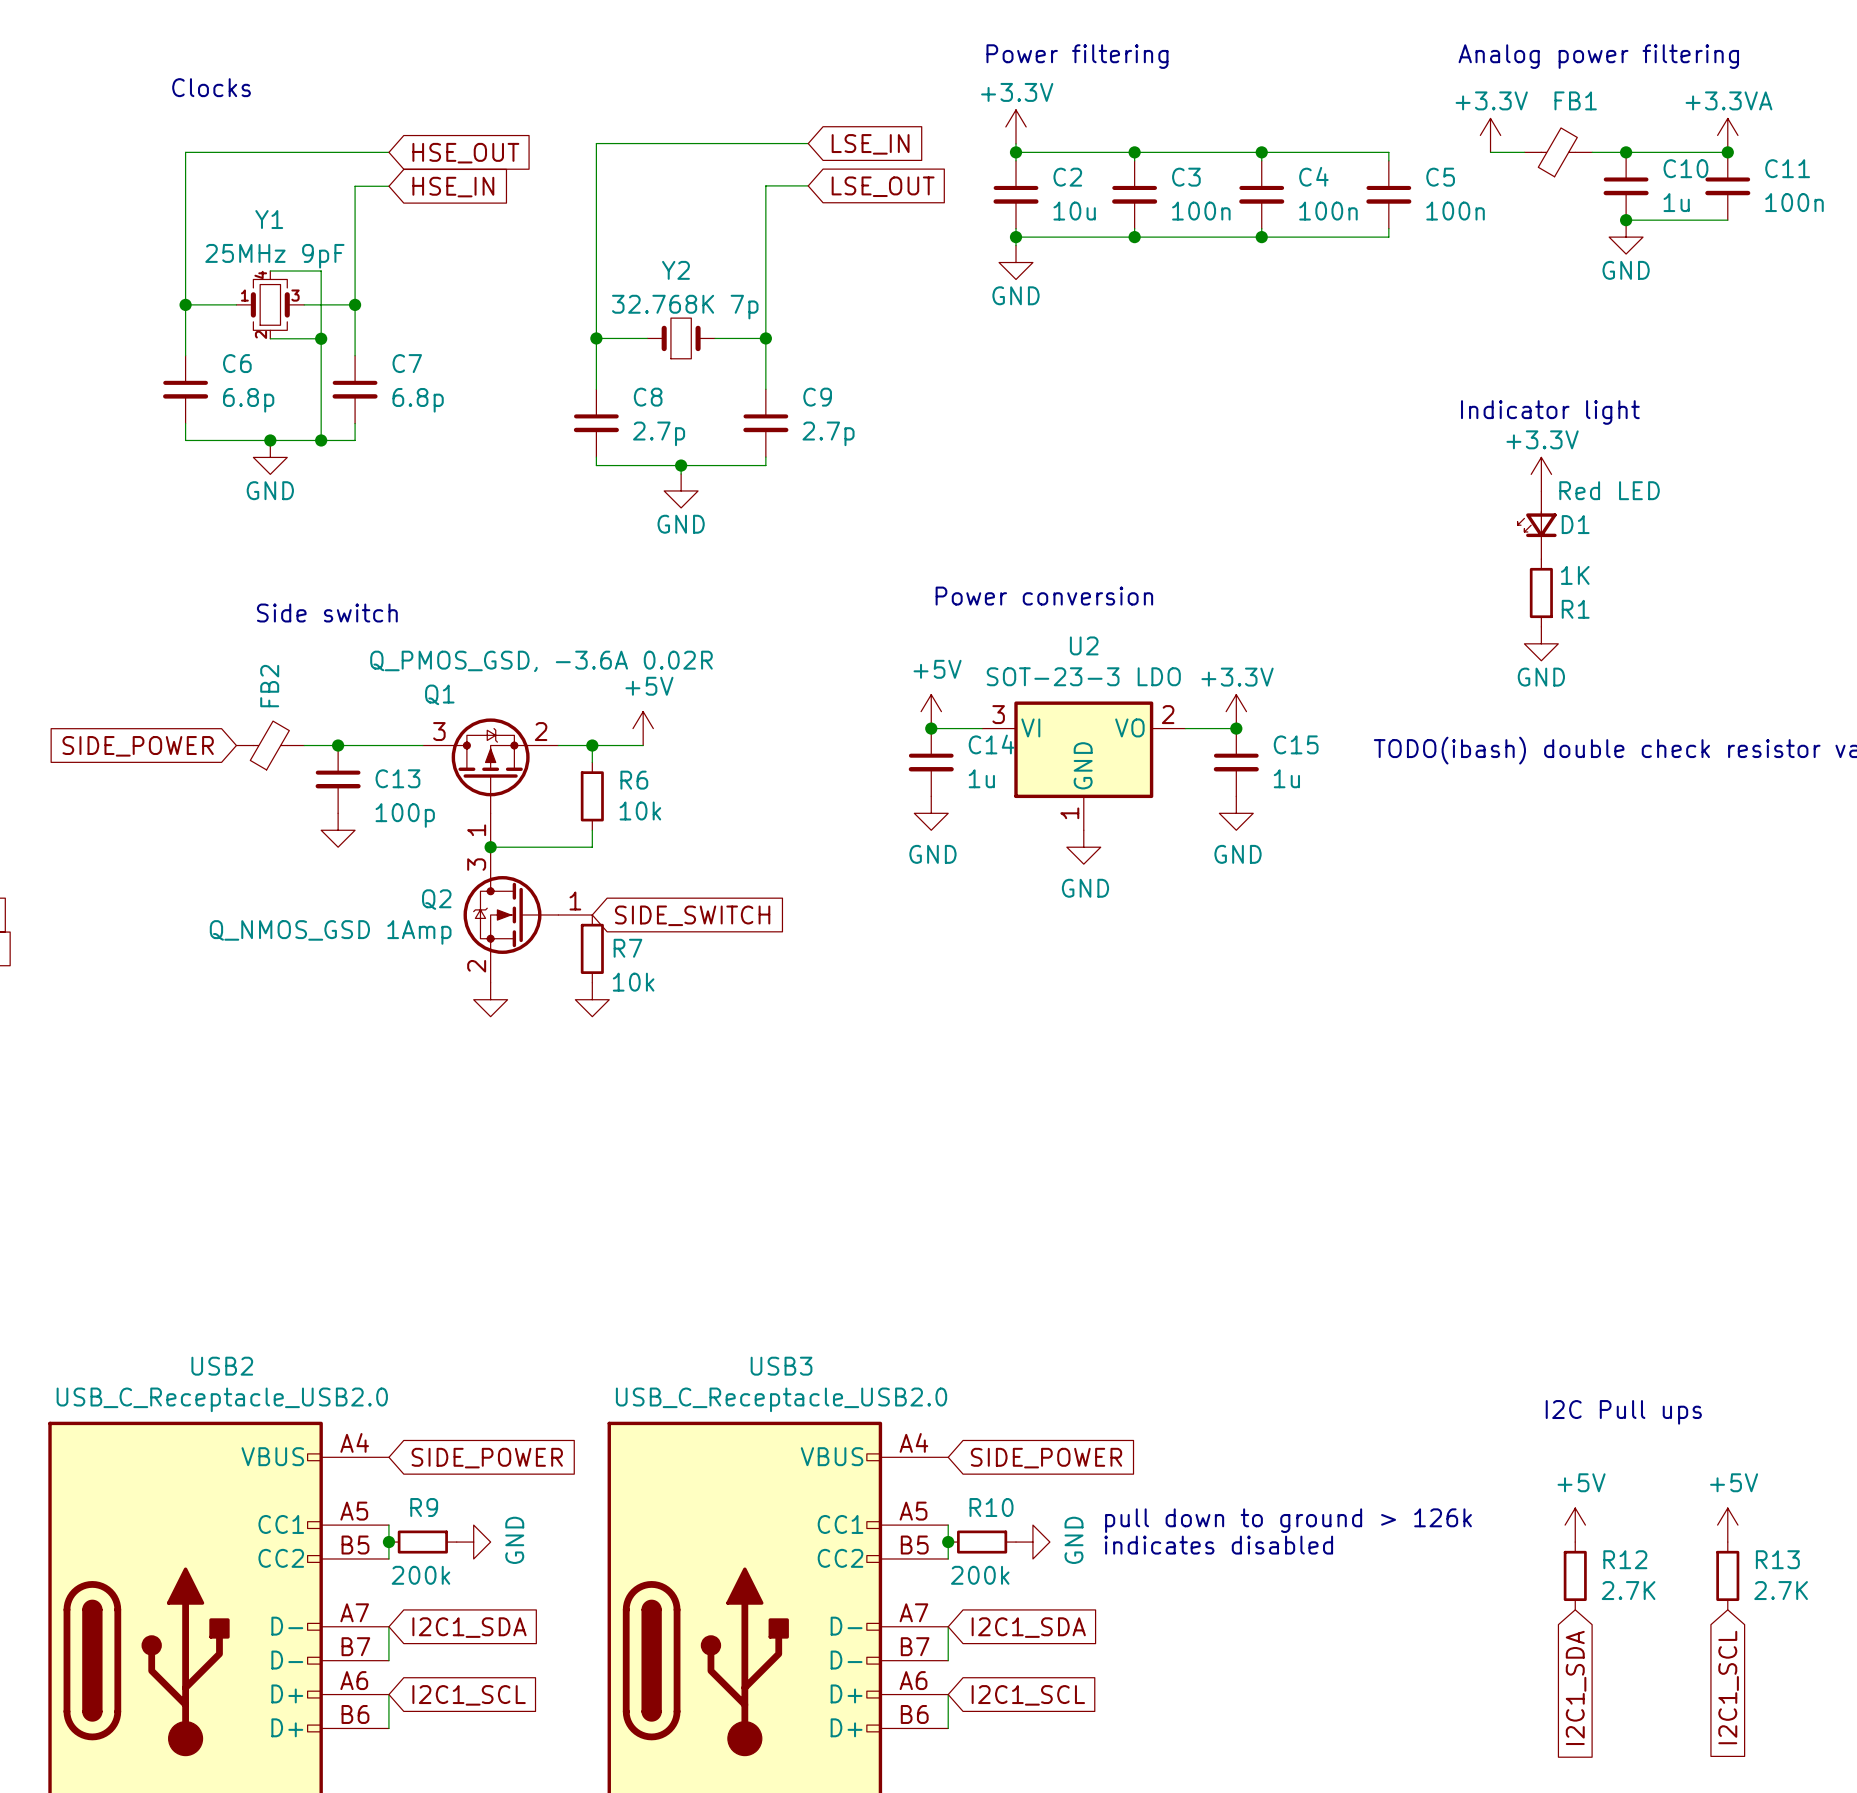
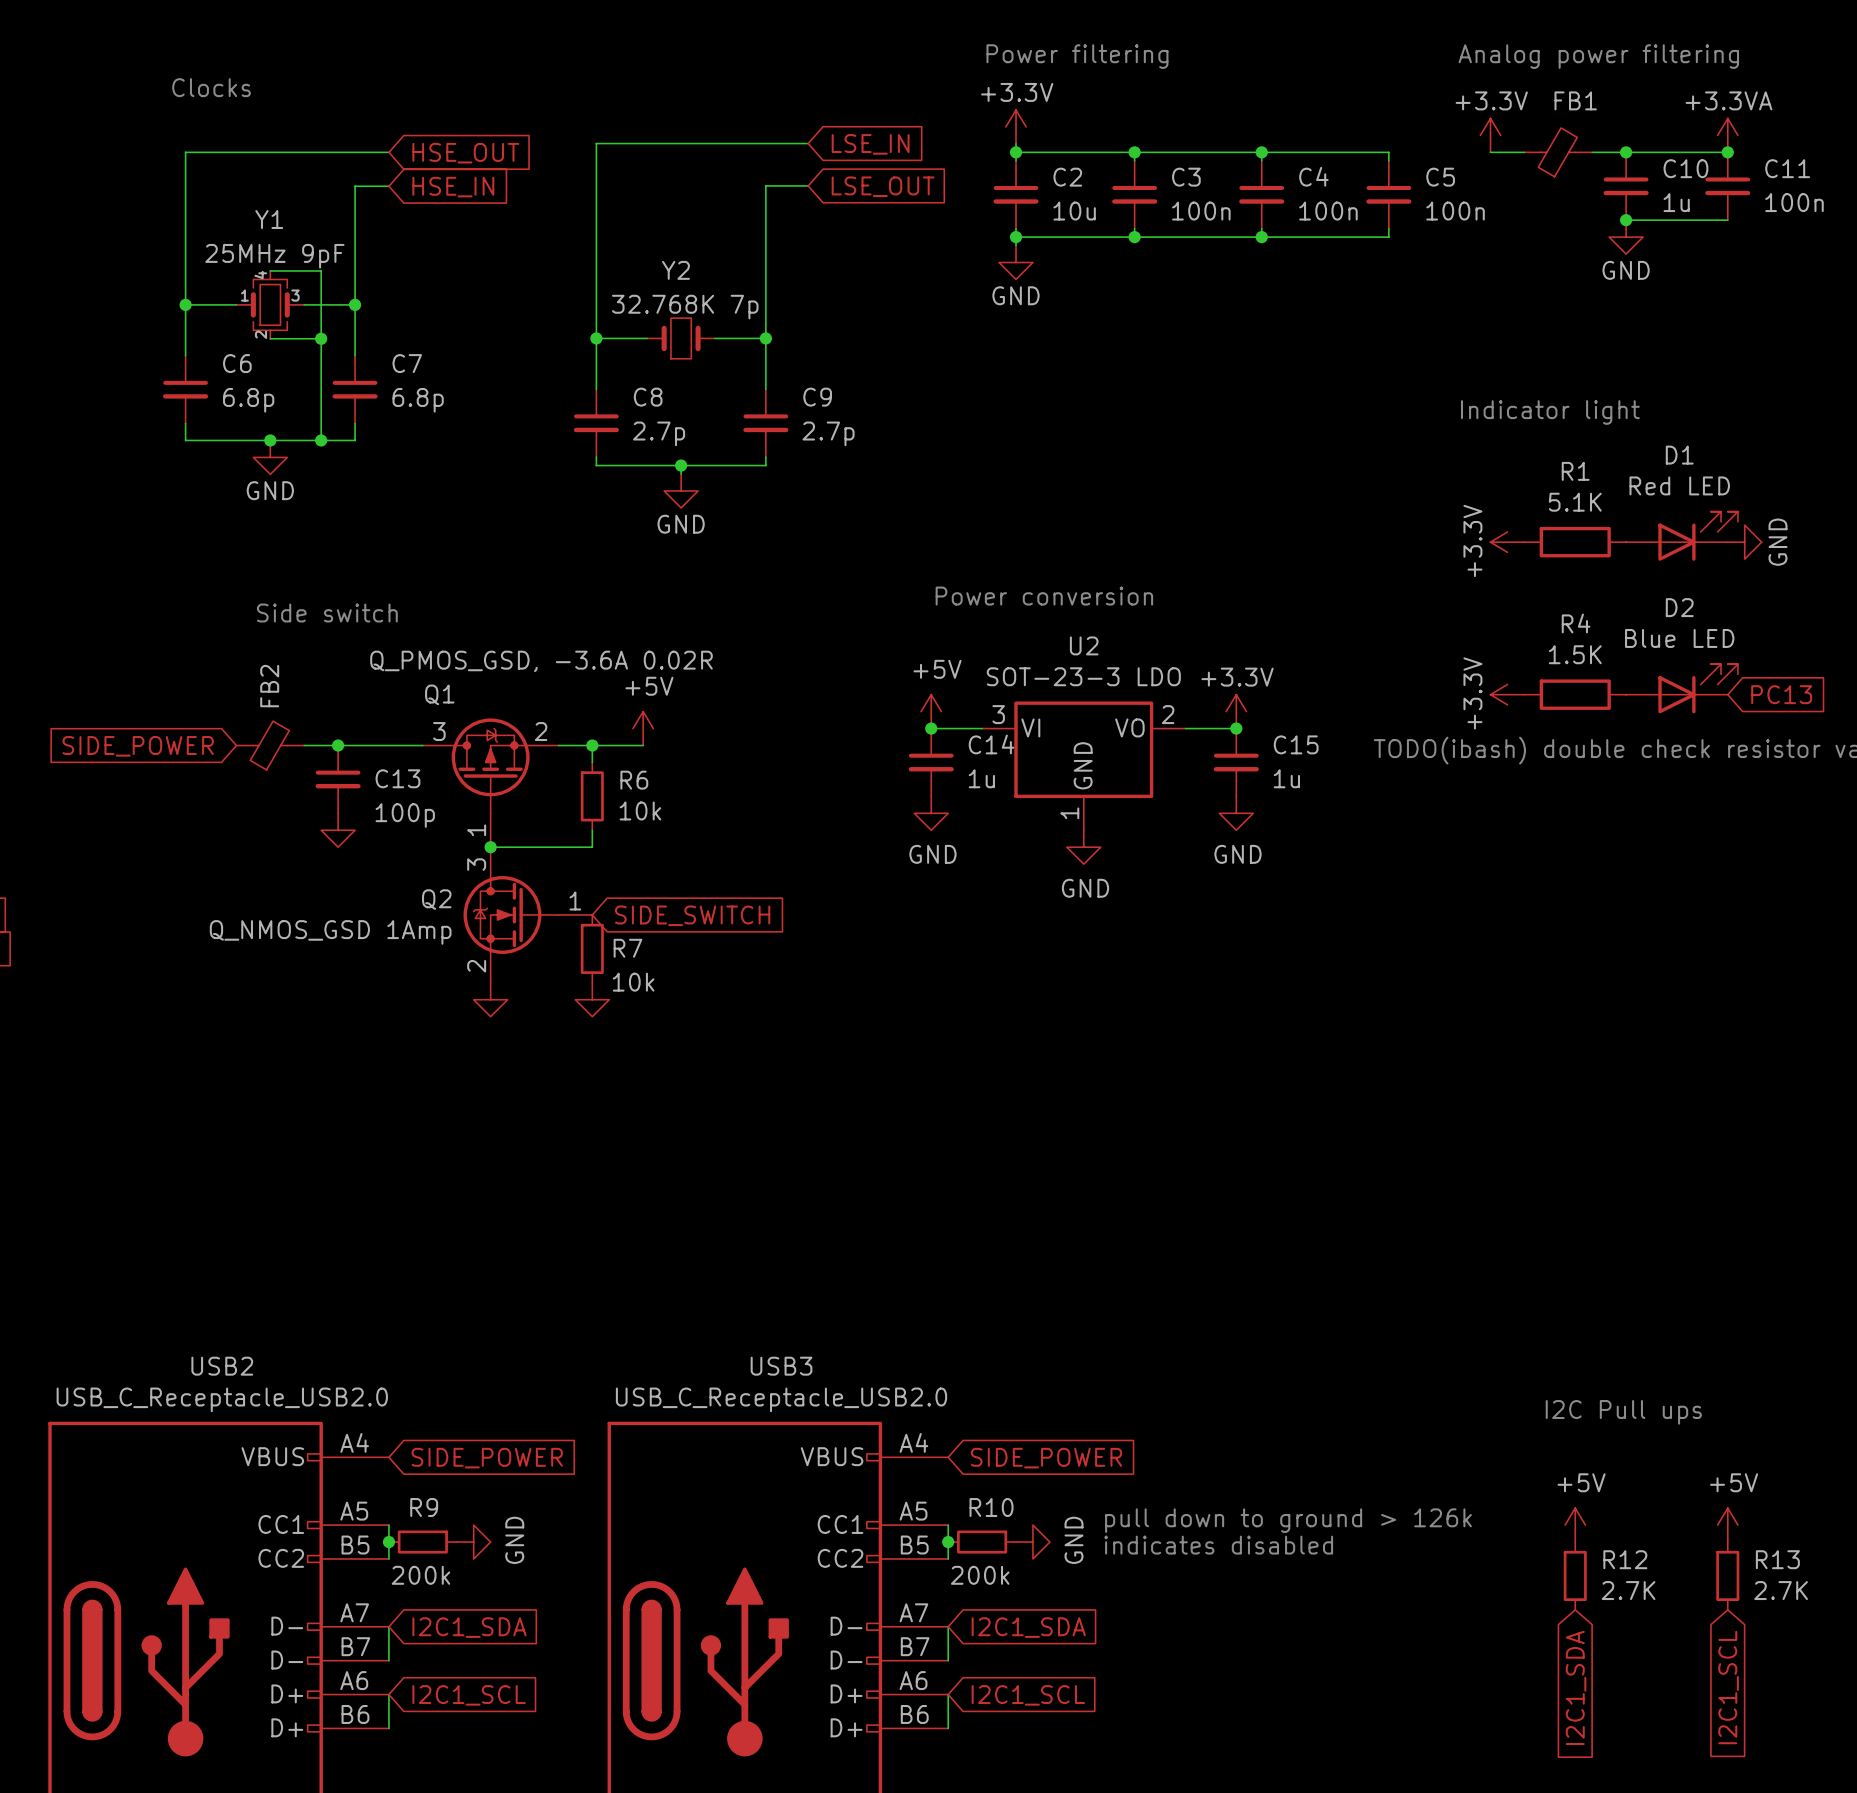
power symbol rotation: 0° (1541, 474) -> 90° counterclockwise (1507, 542)
power symbol position: +3.3V (1541, 474) -> +3.3V (1507, 542)
D1 value position: Red LED (1609, 490) -> Red LED (1679, 485)
D1 symbol: [1517, 491, 1557, 560] -> [1626, 511, 1738, 561]
D1 name position: D1 (1575, 524) -> D1 (1679, 455)
R1 symbol: [1529, 559, 1553, 627] -> [1524, 526, 1627, 558]
R1 value: 1K (1575, 575) -> 5.1K (1575, 502)
R1 name position: R1 (1575, 609) -> R1 (1575, 471)
power symbol rotation: 0° (1541, 643) -> 90° counterclockwise (1744, 542)
power symbol position: GND (1541, 643) -> GND (1744, 542)
D2: none -> Blue LED (1682, 688)
power symbol: none -> +3.3V (1507, 694)
R4: none -> 1.5K (1575, 694)
global label: none -> PC13 (1781, 694)

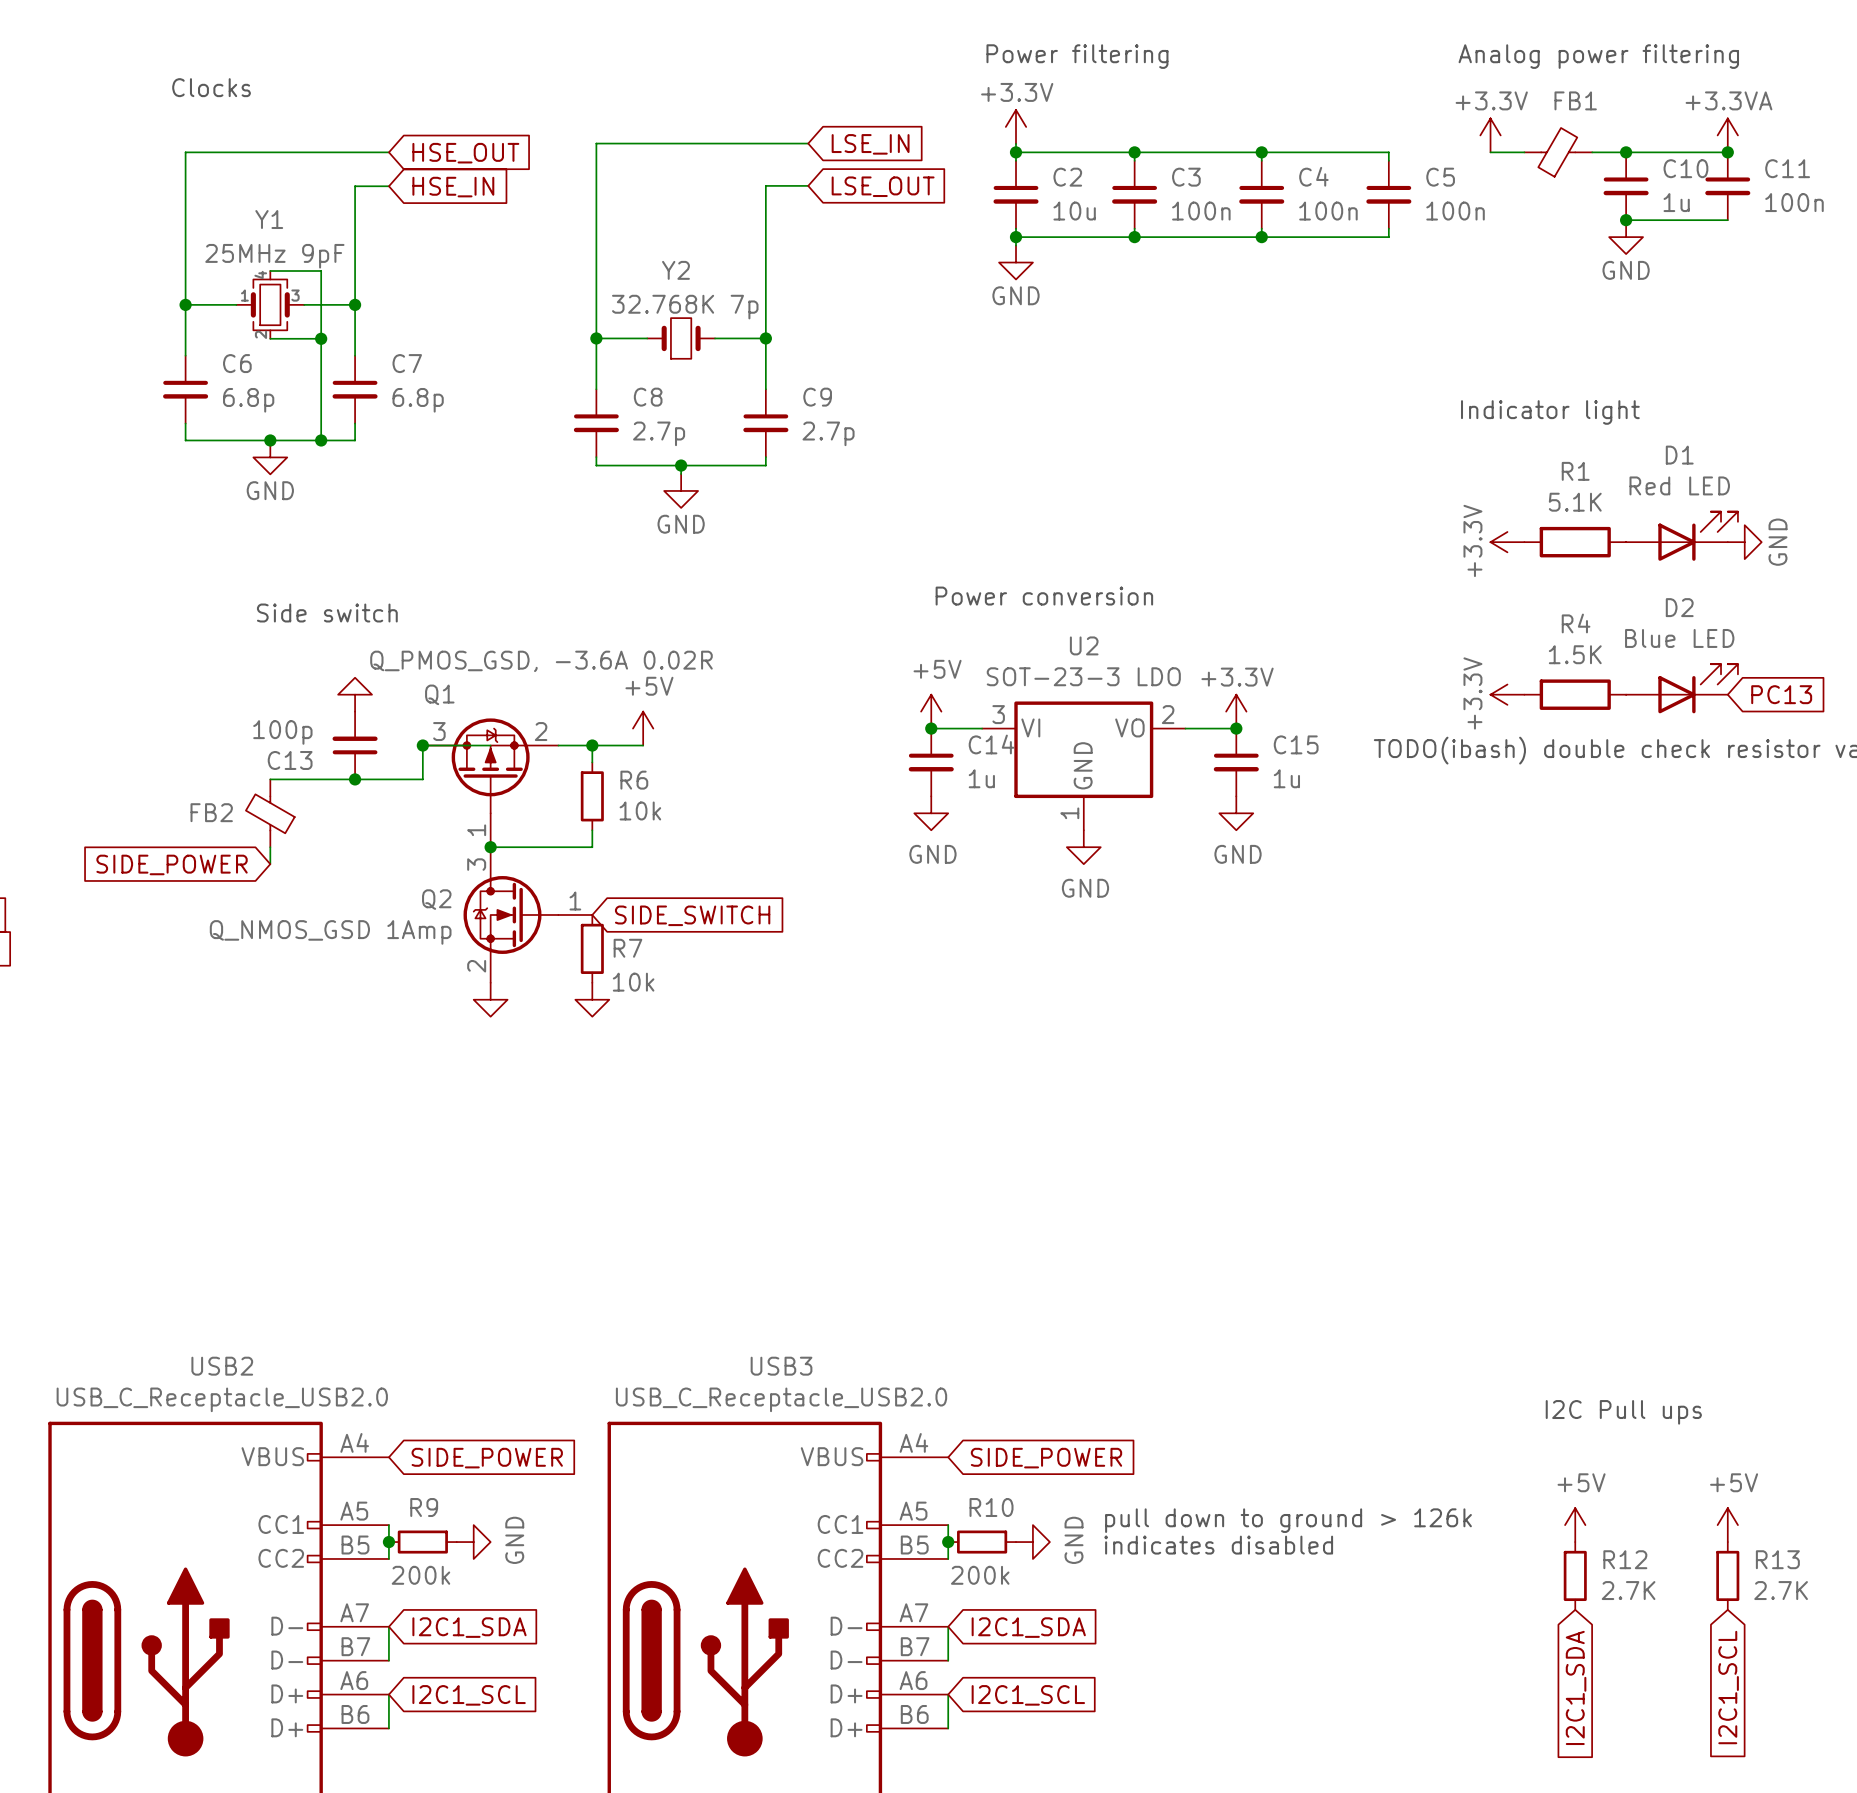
FB2 rotation: 0° (269, 745) -> 90° counterclockwise (270, 813)
FB2 position: (270, 745) -> (270, 813)
wire: (304, 745) (422, 745) -> none
junction position: (338, 745) -> (355, 779)
junction: none -> (422, 745)
wire: none -> (490, 745) (422, 745) (422, 779) (270, 779)
global label position: SIDE_POWER (138, 746) -> SIDE_POWER (172, 864)
C13 rotation: 0° (338, 779) -> 180° (355, 745)
power symbol rotation: 0° (338, 830) -> 180° (355, 694)
power symbol position: (338, 830) -> (355, 694)
wire: none -> (270, 847) (270, 864)

